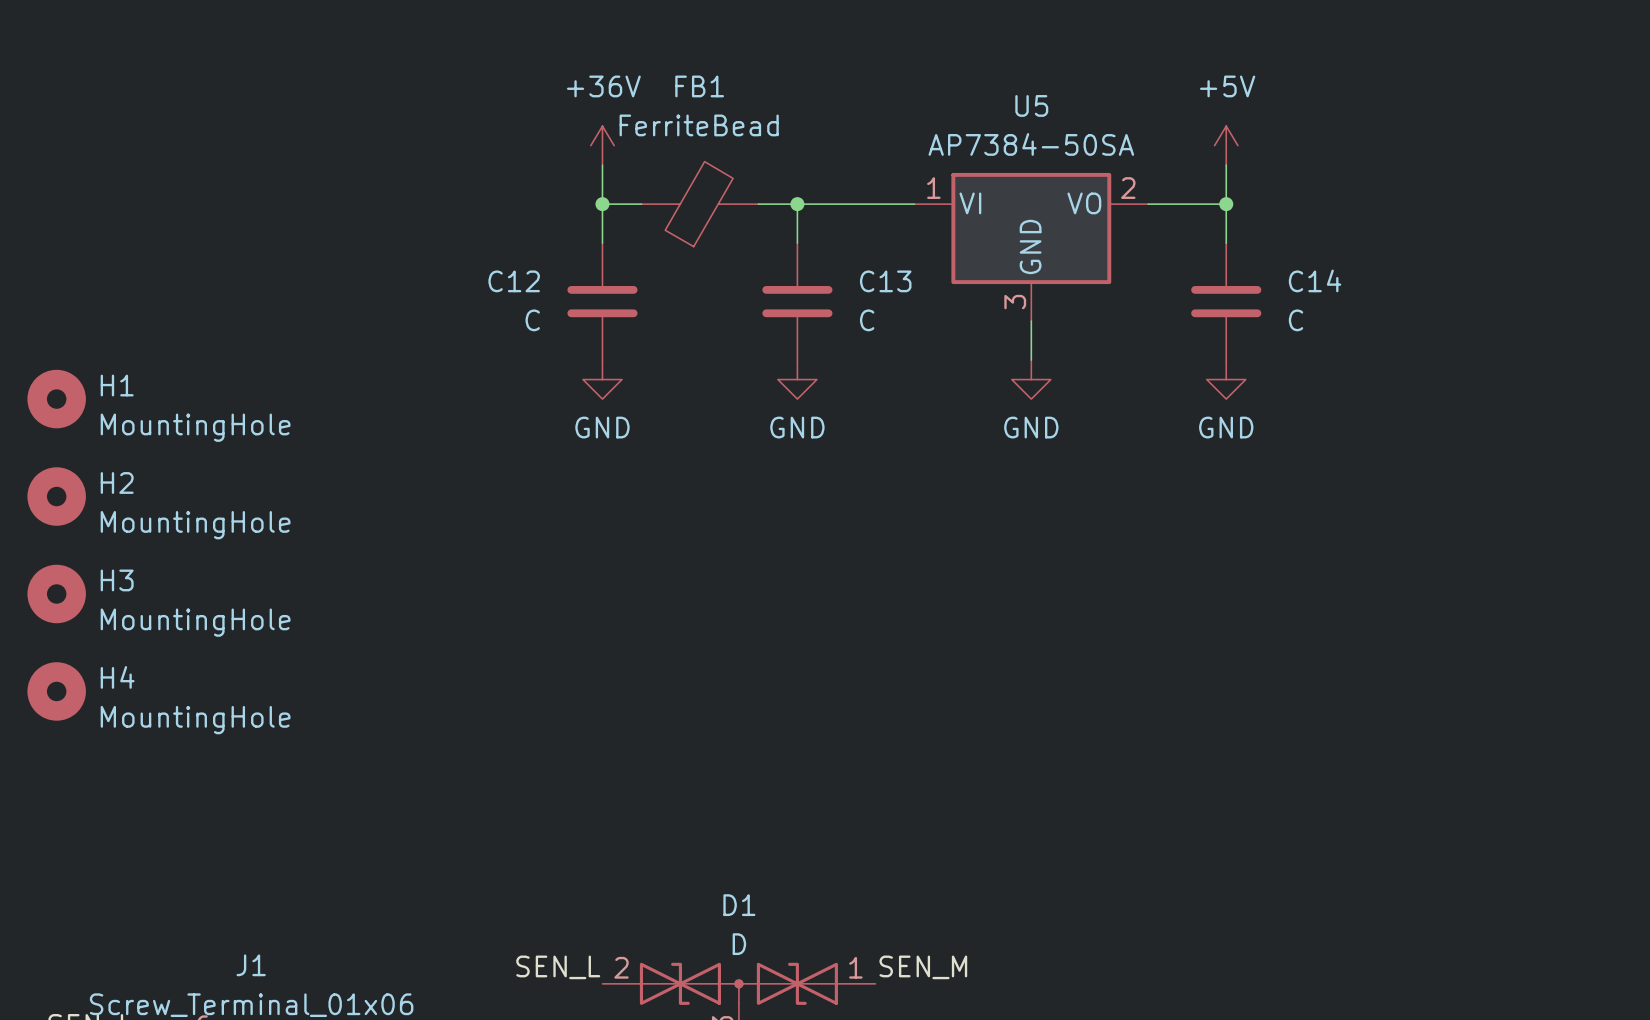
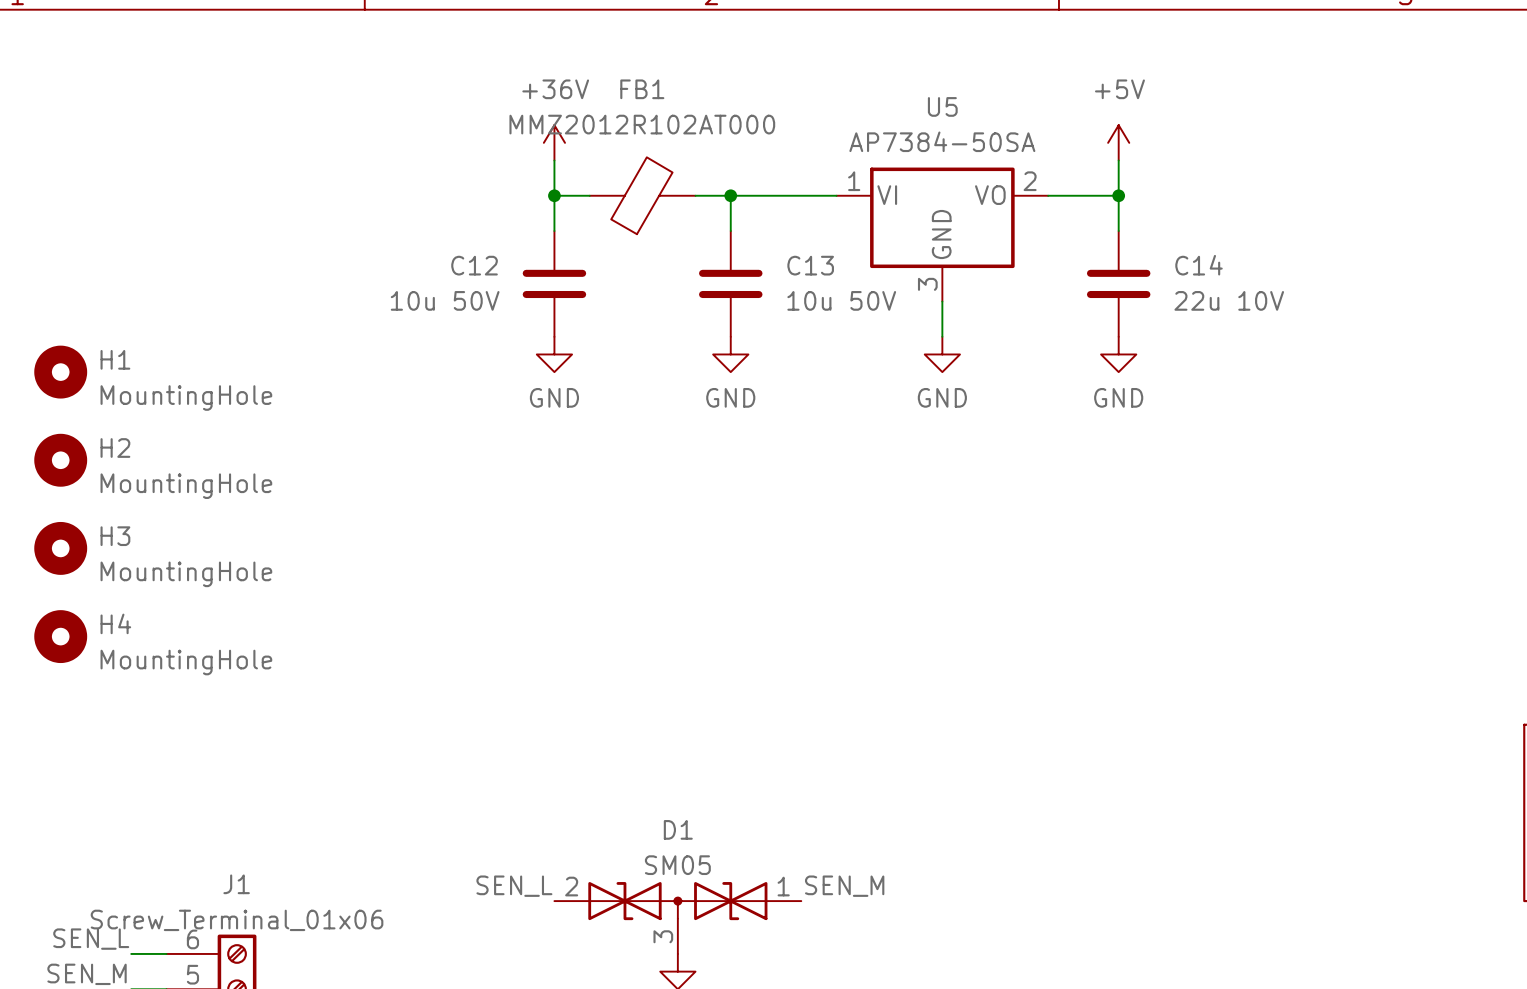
FB1 value: FerriteBead (699, 125) -> MMZ2012R102AT000 (642, 124)
C12 value: C (532, 320) -> 10u 50V (445, 300)
C13 value: C (867, 320) -> 10u 50V (841, 300)
C14 value: C (1296, 320) -> 22u 10V (1229, 300)
D1 value: D (739, 944) -> SM05 (677, 865)

